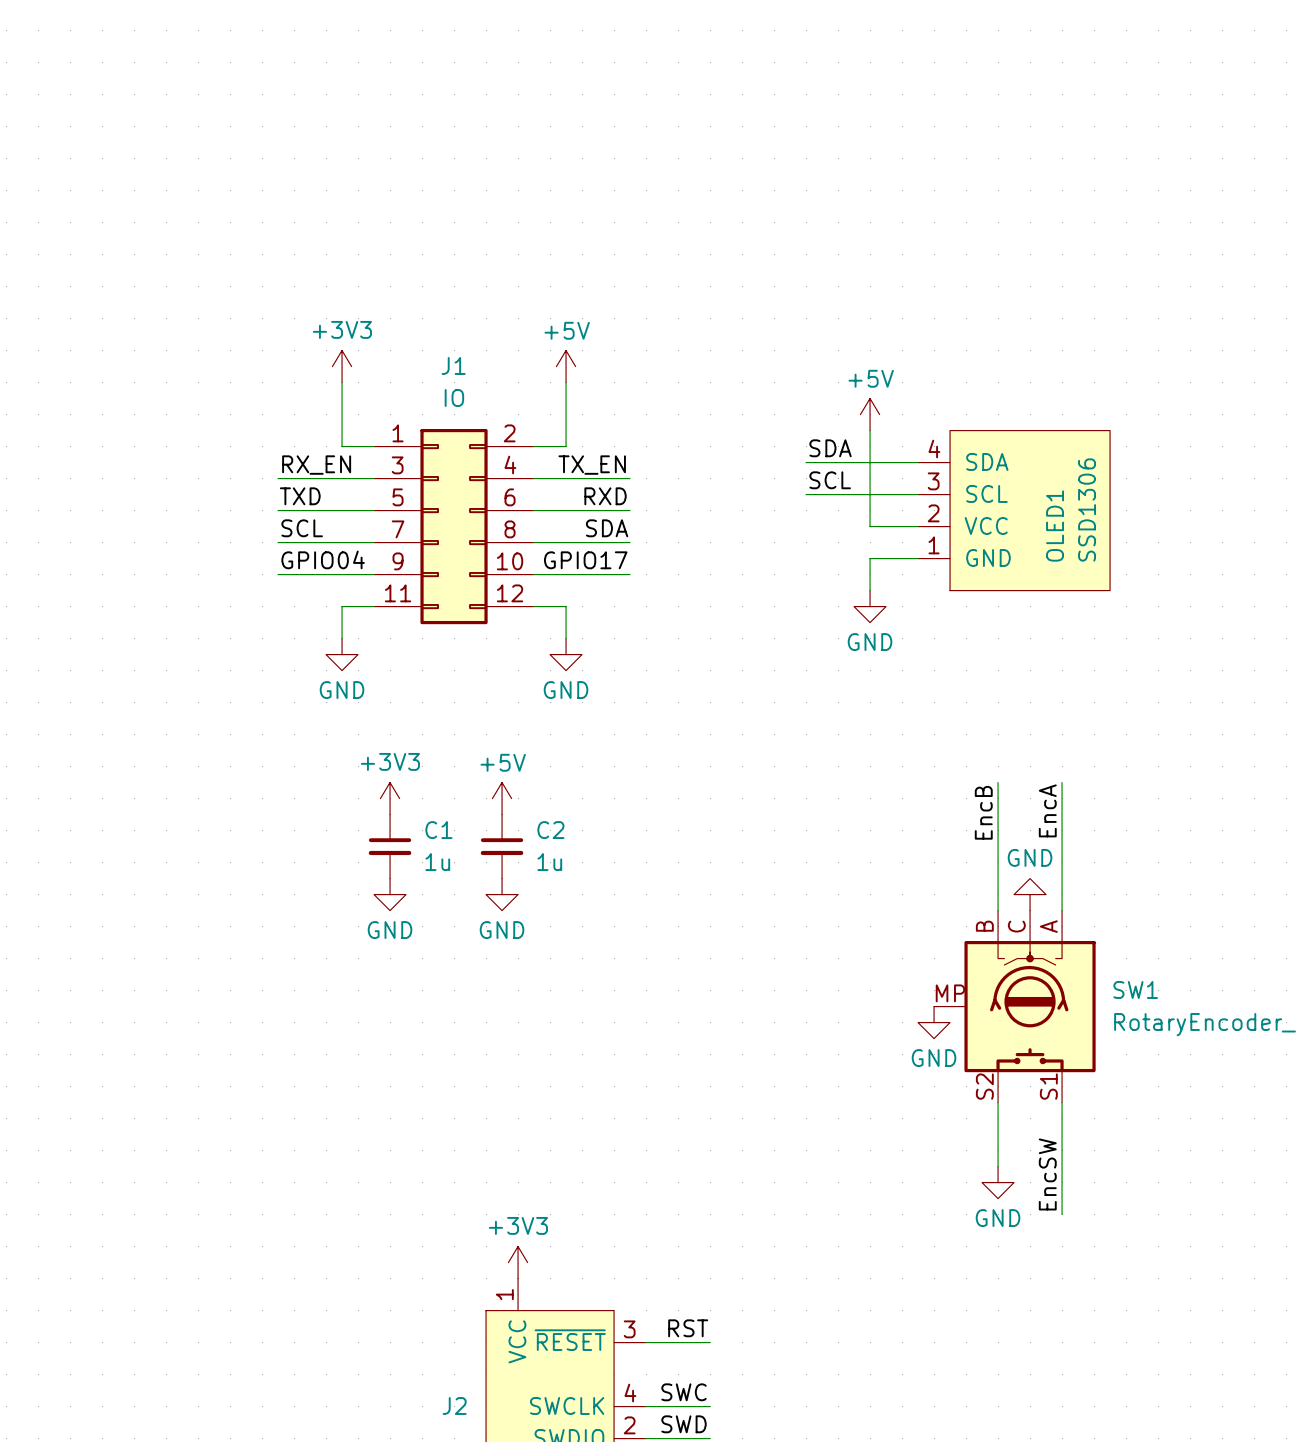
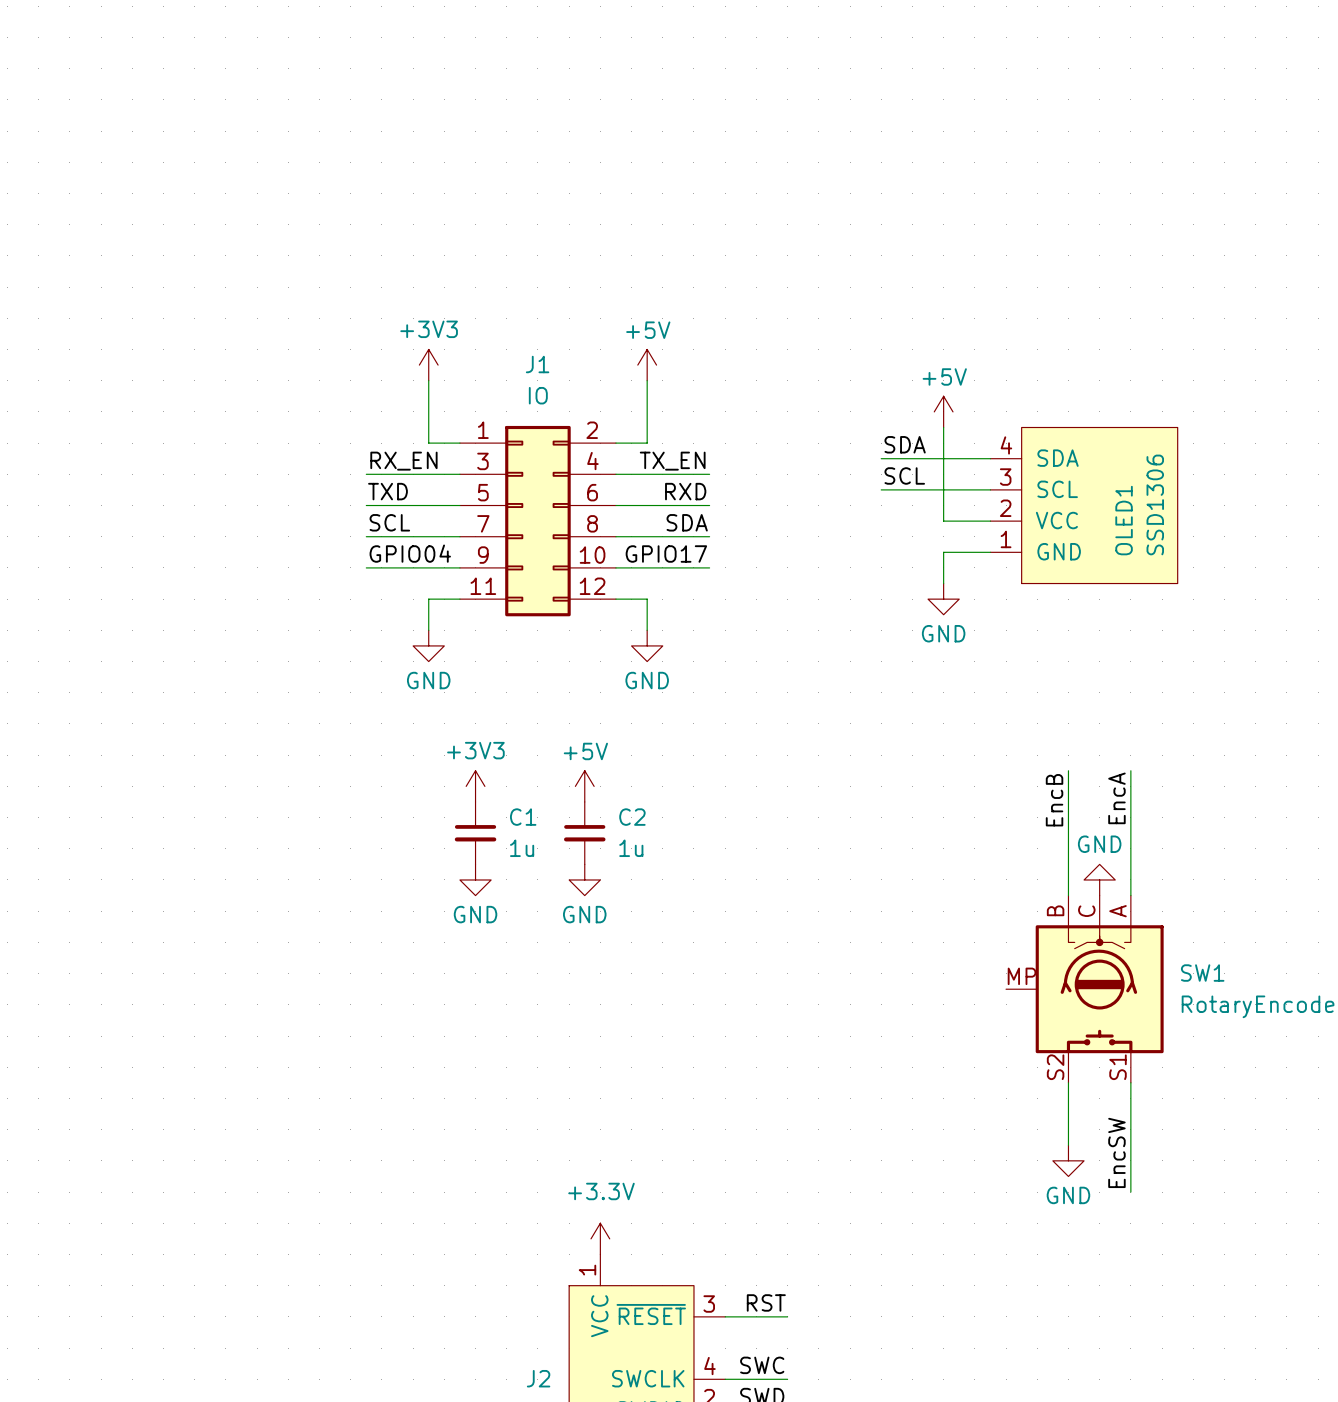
power symbol: GND (934, 1022) -> none
power symbol: +3V3 (518, 1262) -> +3.3V (600, 1238)

